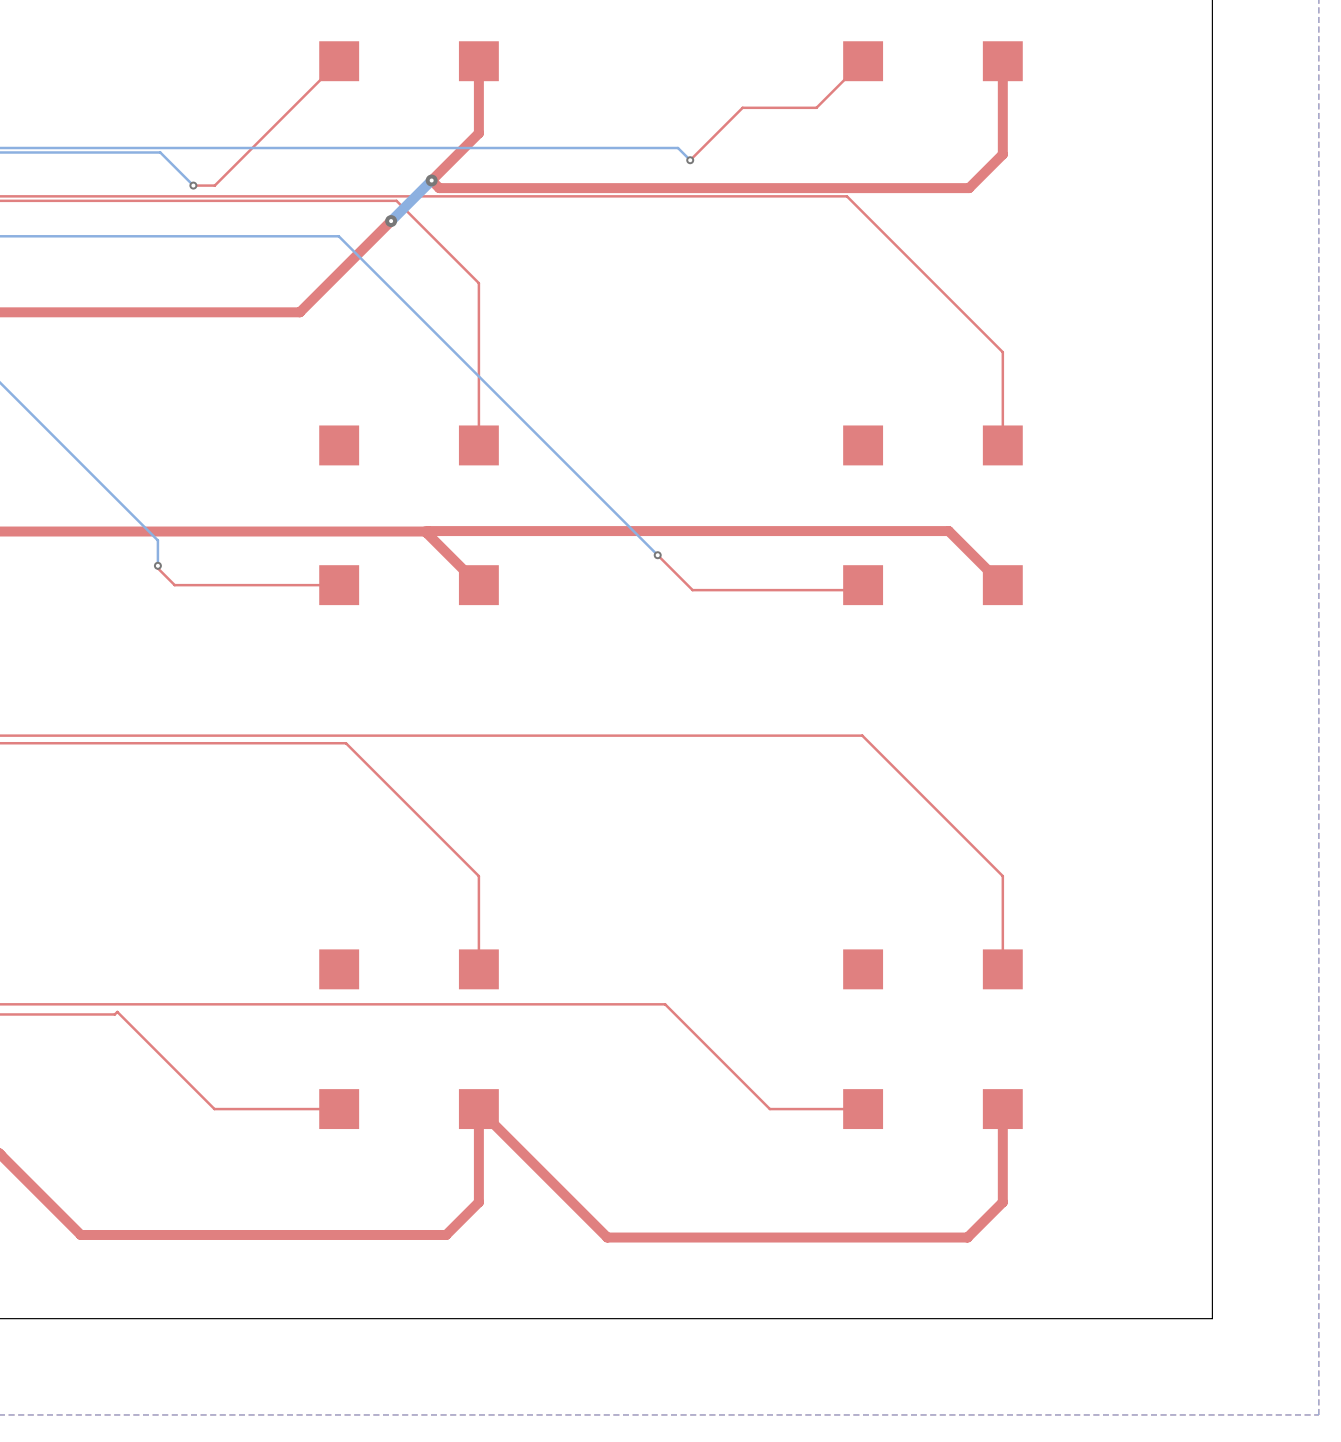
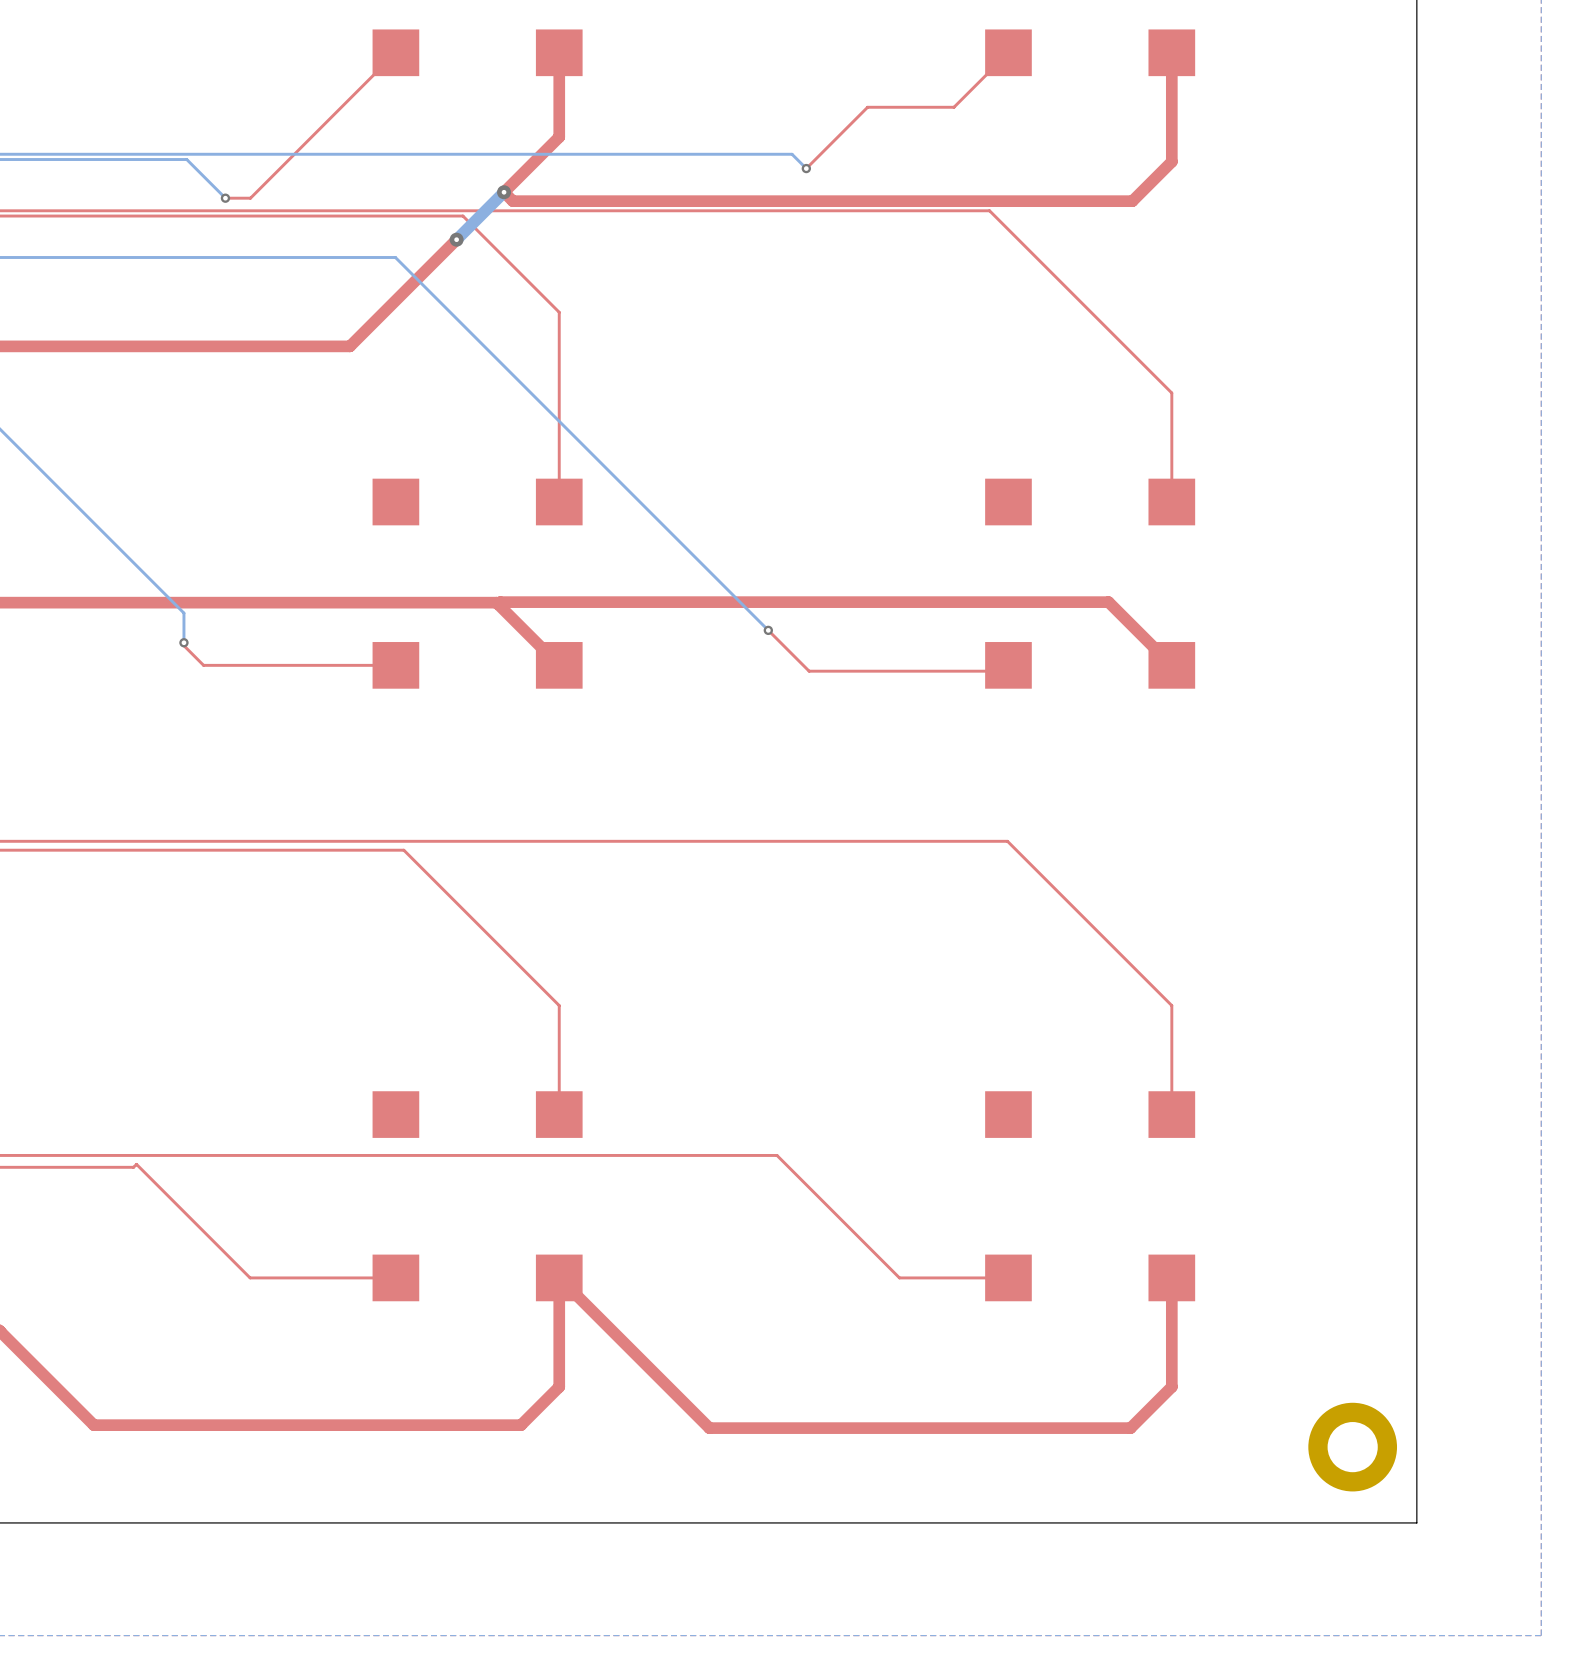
part: none -> (1352, 1447)

